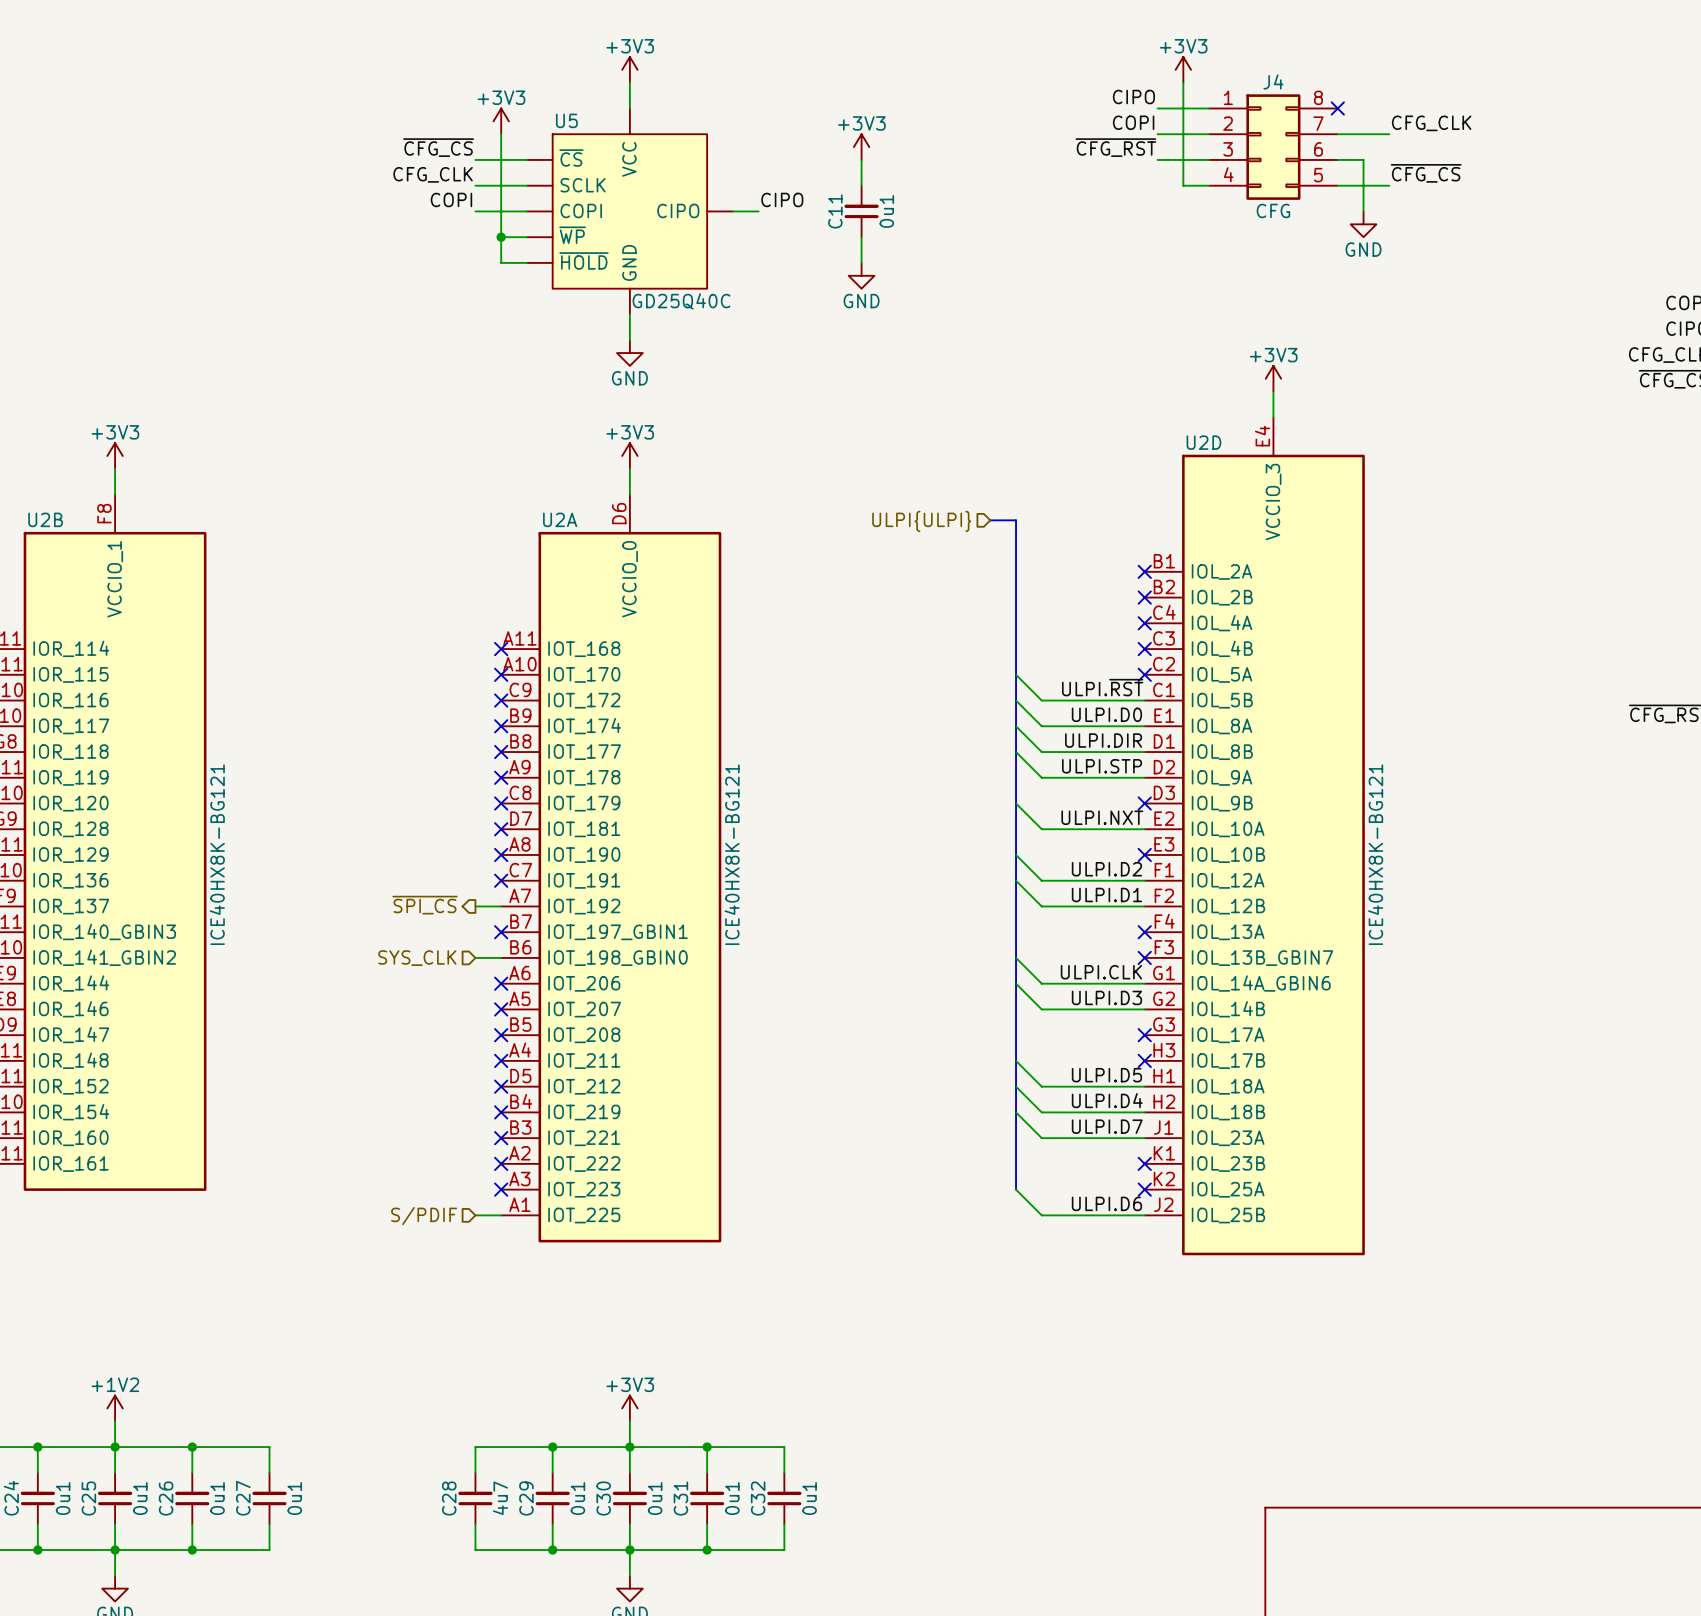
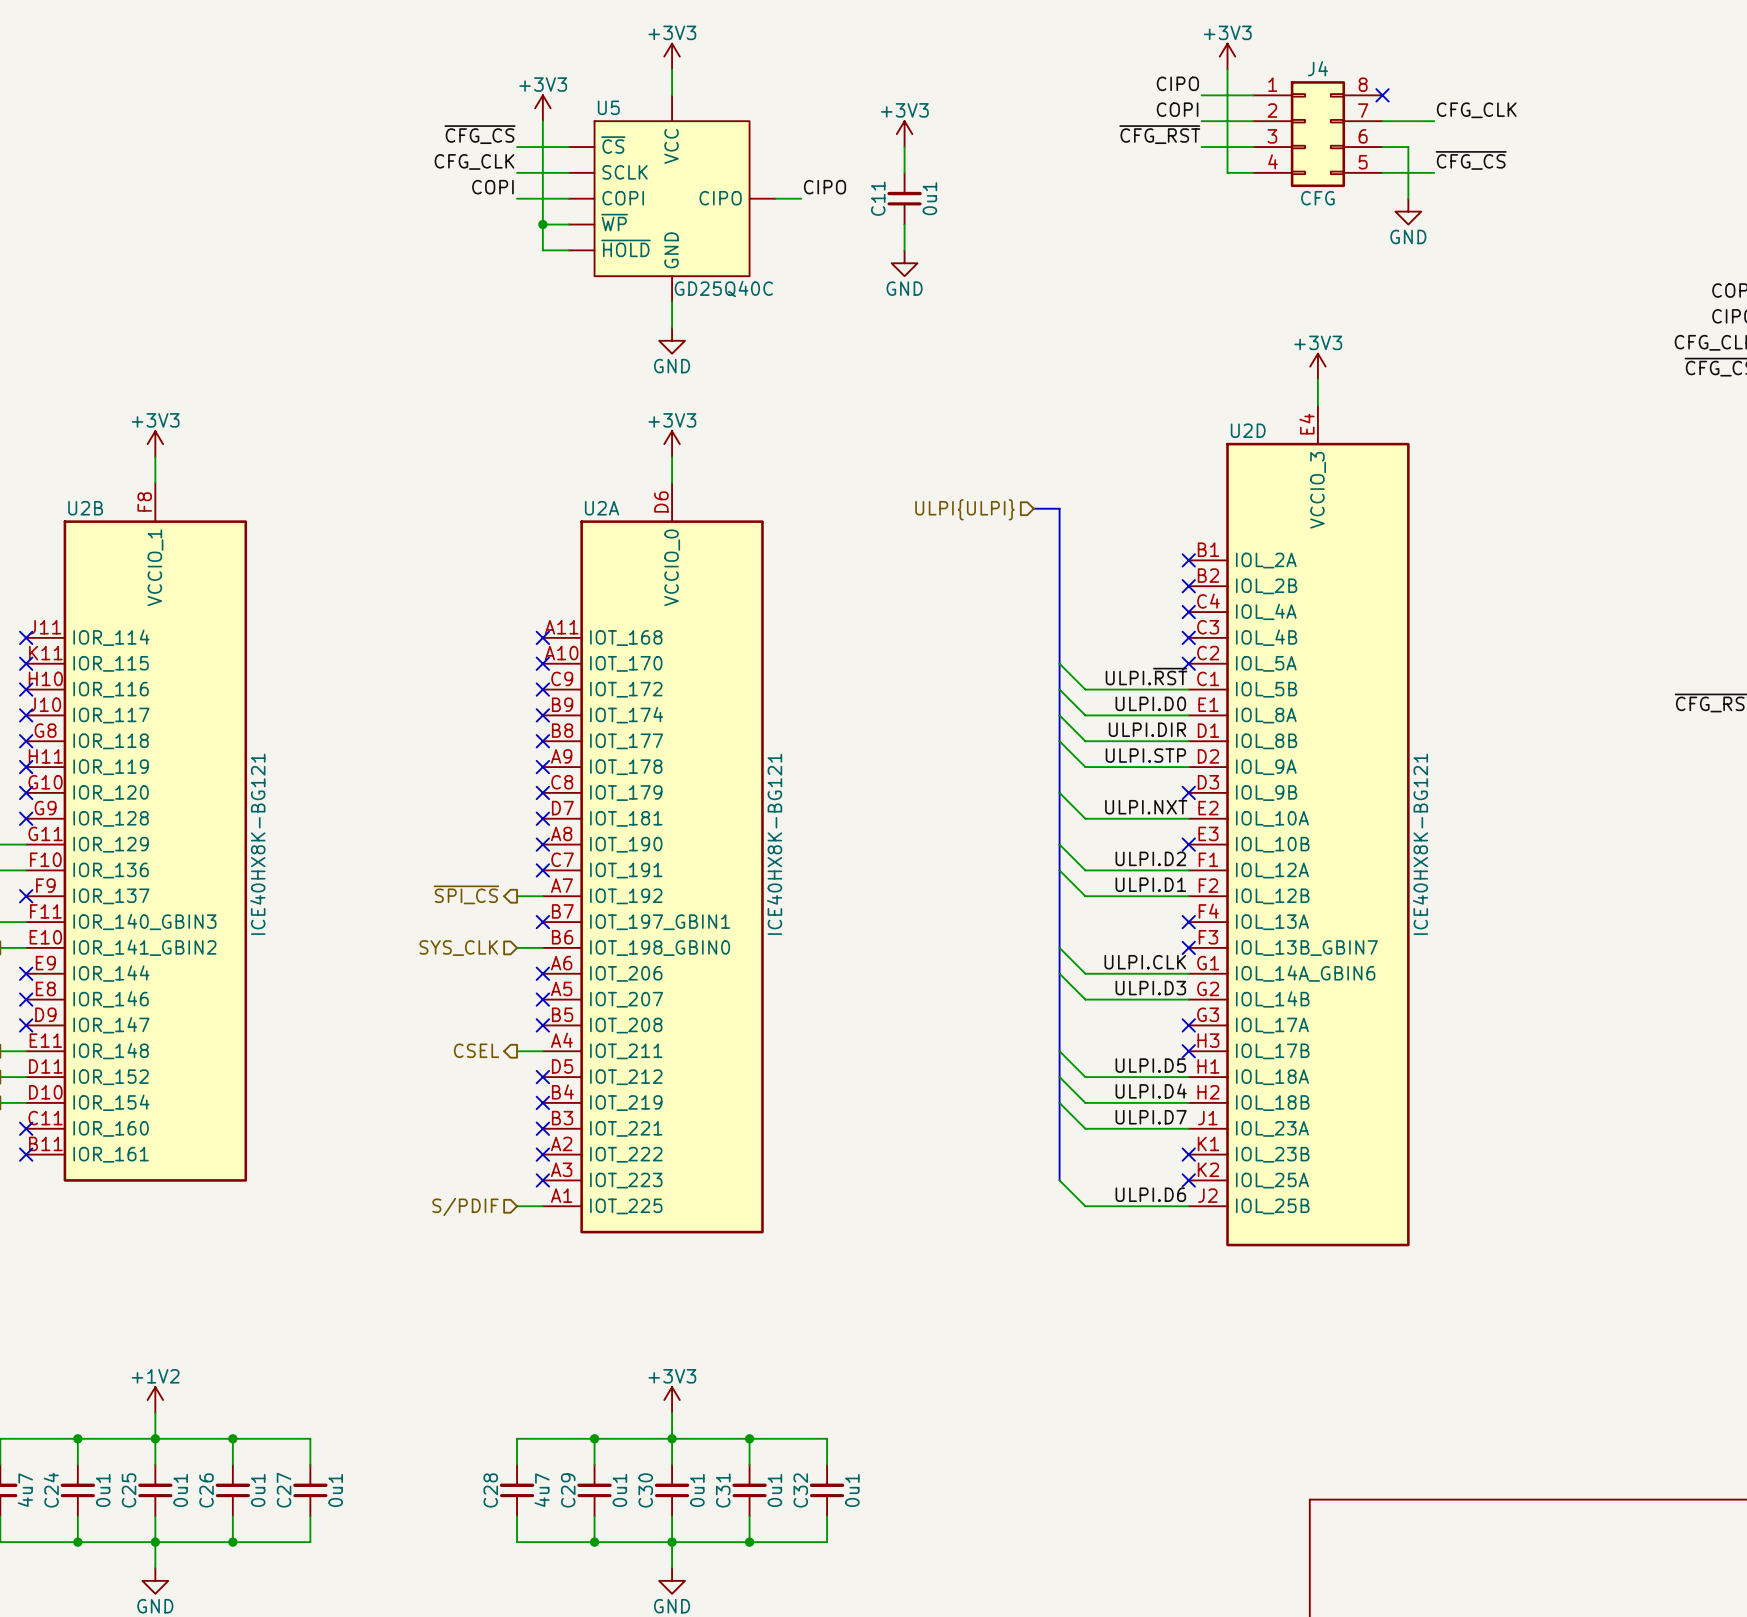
hierarchical label: none -> CSEL (476, 1050)
wire: none -> (517, 1051) (542, 1051)
no-connect mark: (501, 1060) -> none

